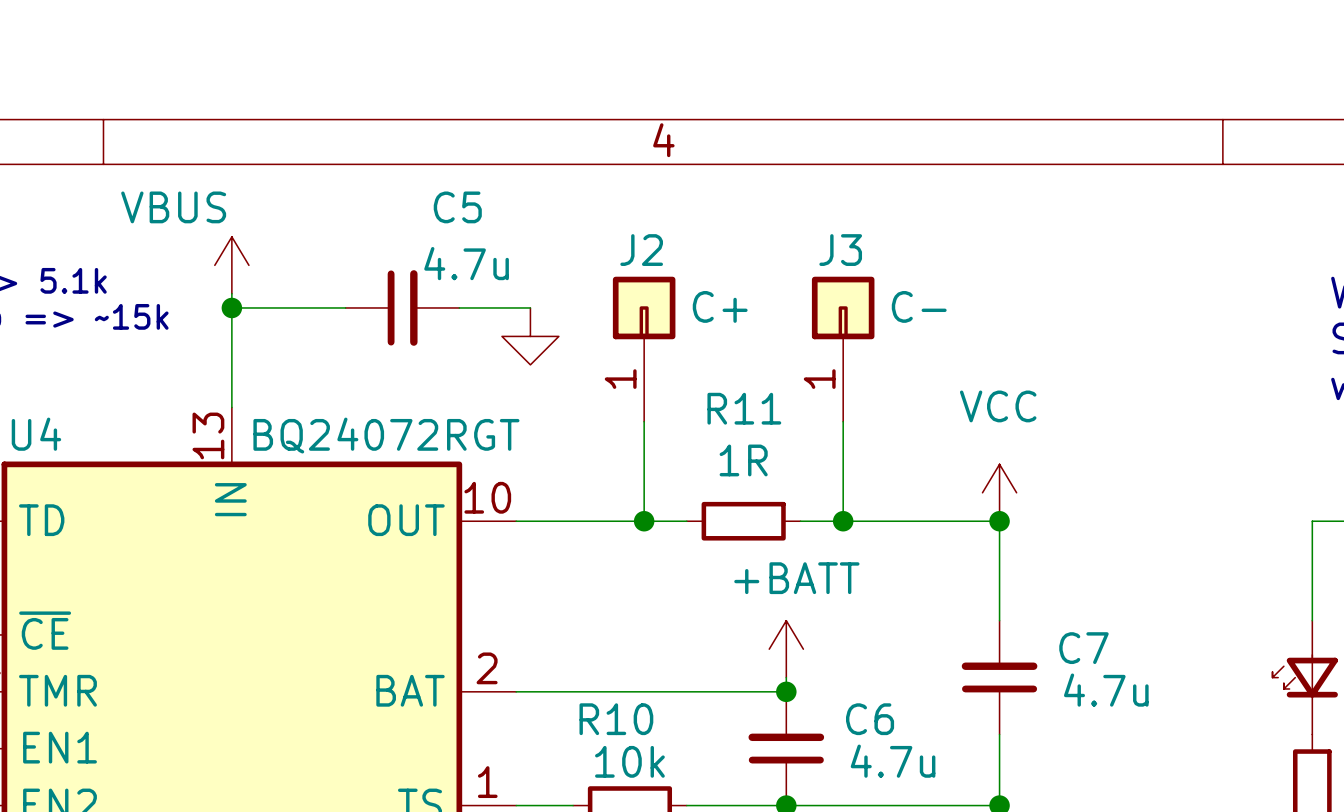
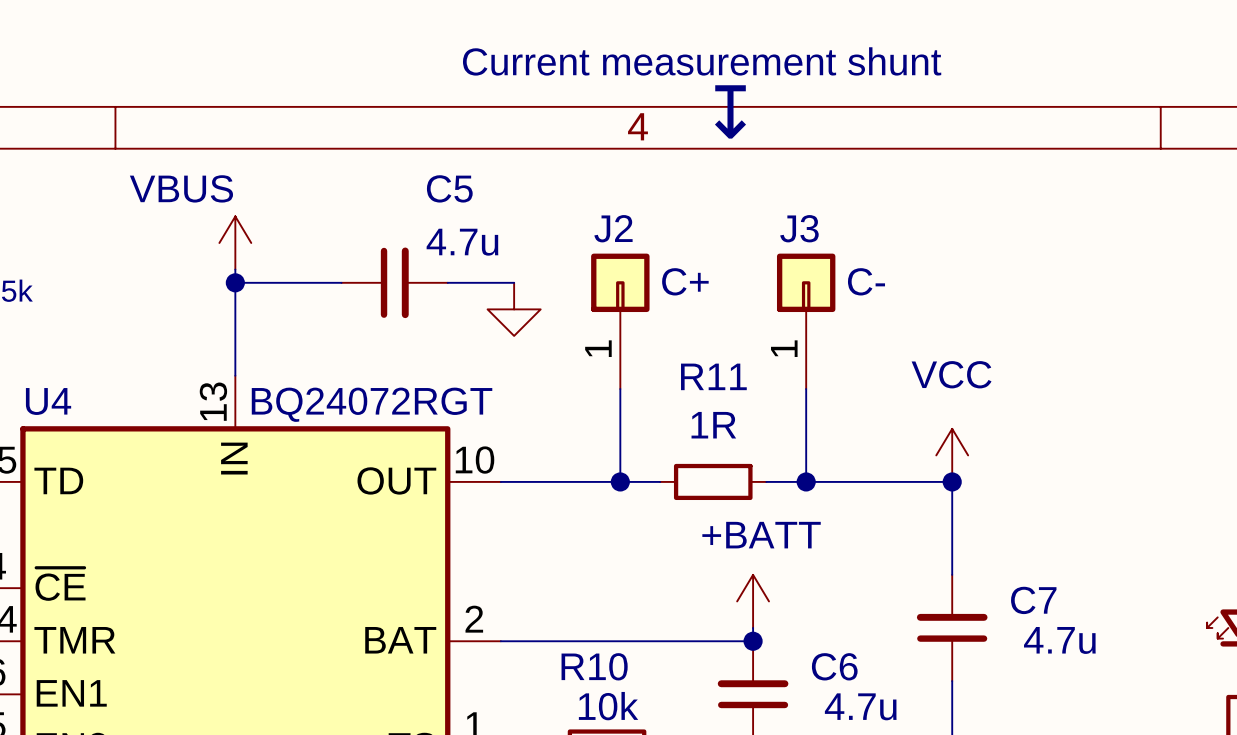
text: none -> Current measurement shunt (702, 61)
text: none -> ↧ (730, 111)

